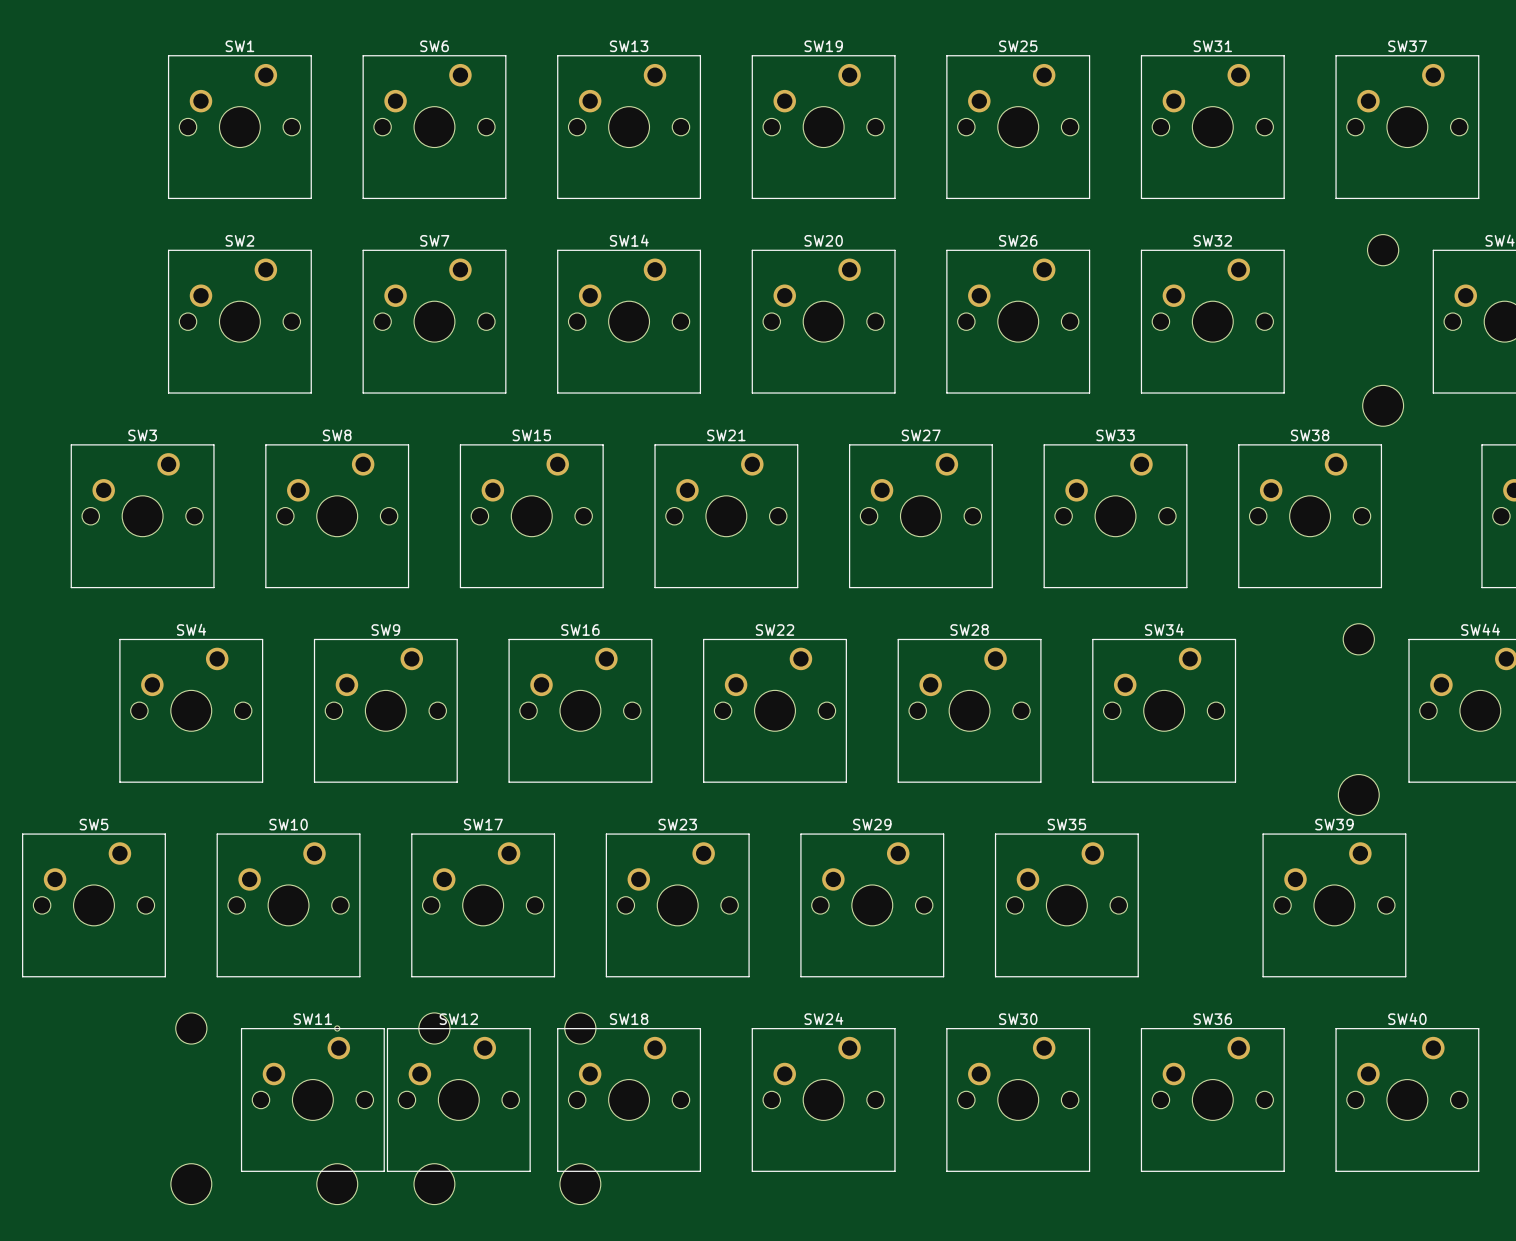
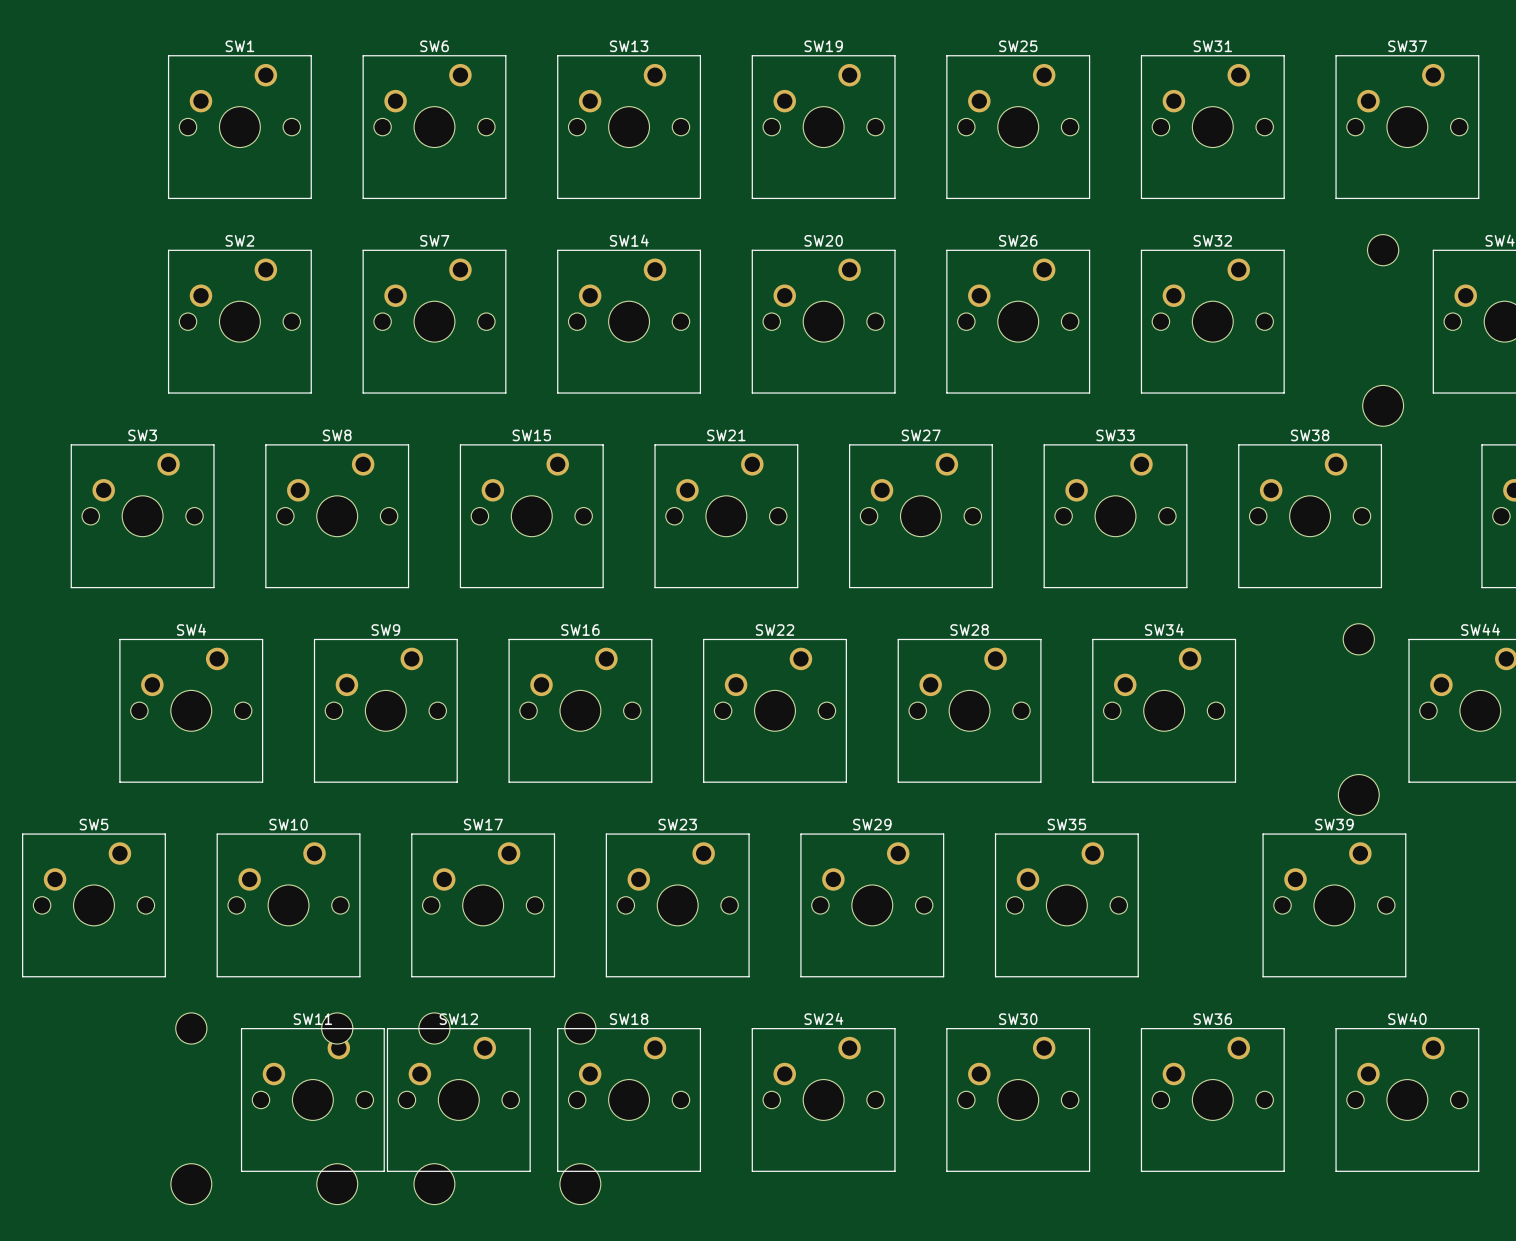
SW12 footprint: [316, 1012, 601, 1205] -> [316, 1012, 601, 1205]

